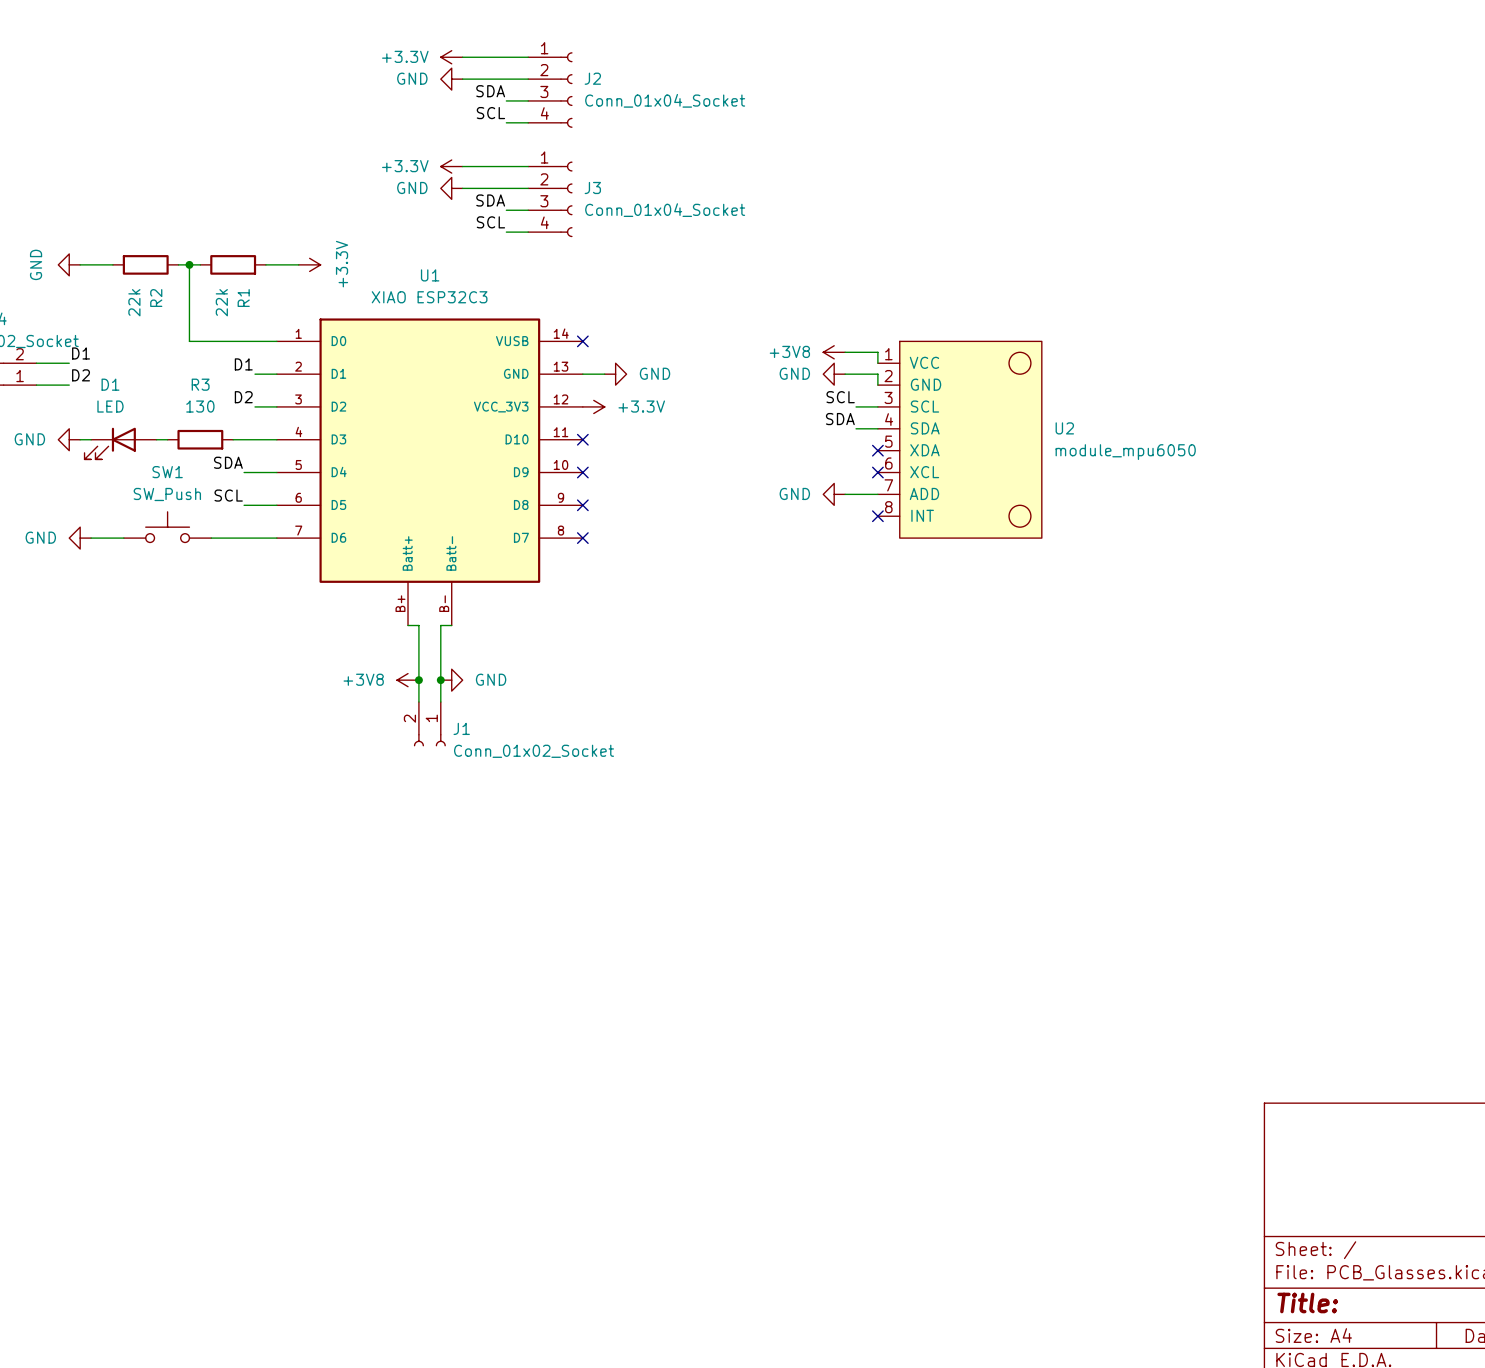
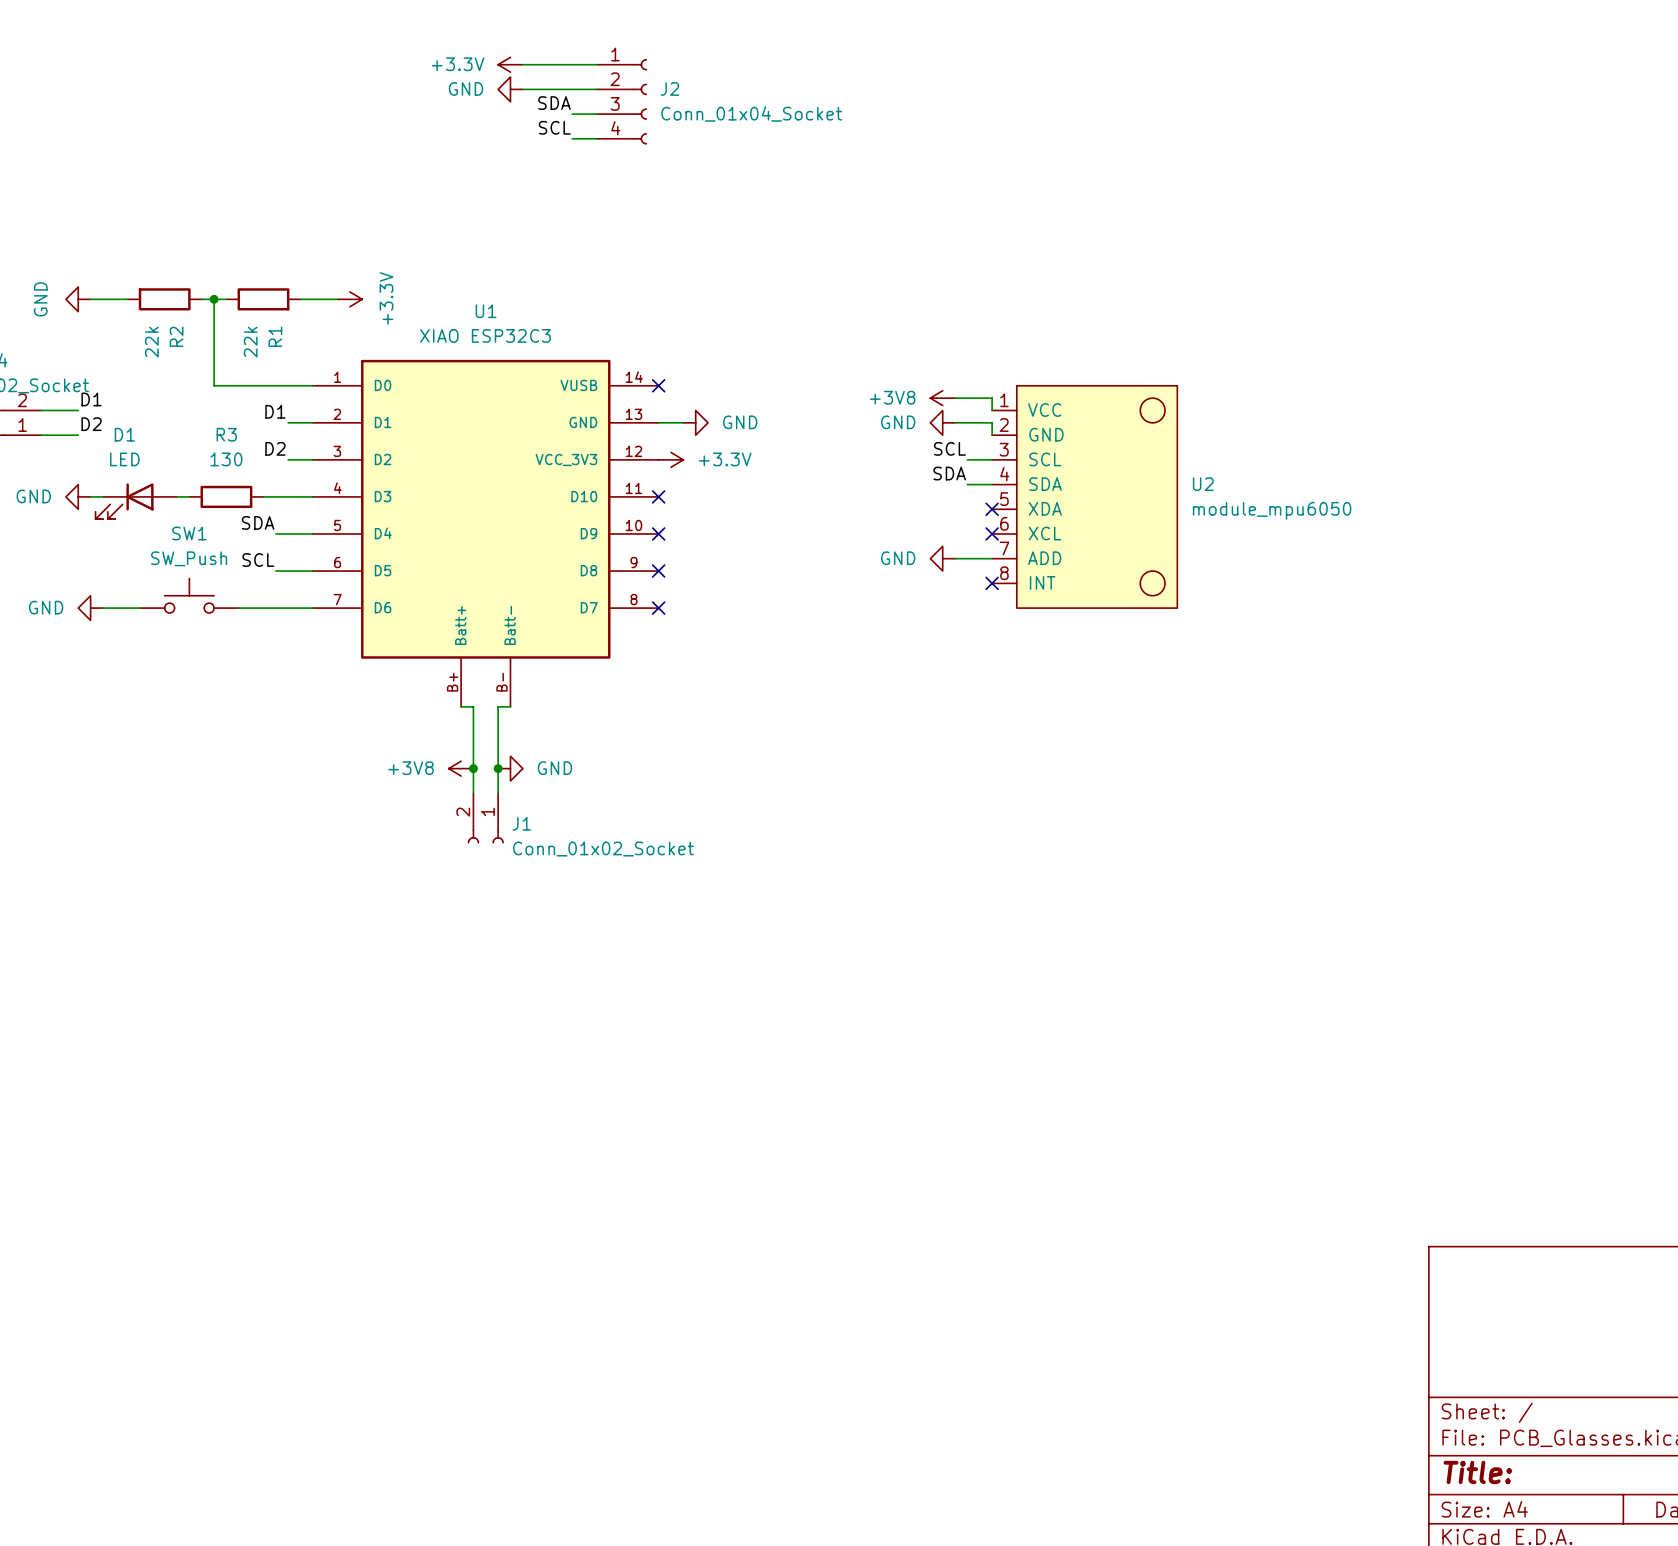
power symbol: +3.3V (451, 166) -> none
wire: (462, 166) (528, 166) -> none
power symbol: GND (451, 188) -> none
wire: (462, 188) (528, 188) -> none
J3: Conn_01x04_Socket (550, 199) -> none
label: SDA (490, 200) -> none
wire: (506, 210) (528, 210) -> none
label: SCL (490, 222) -> none
wire: (506, 232) (528, 232) -> none

